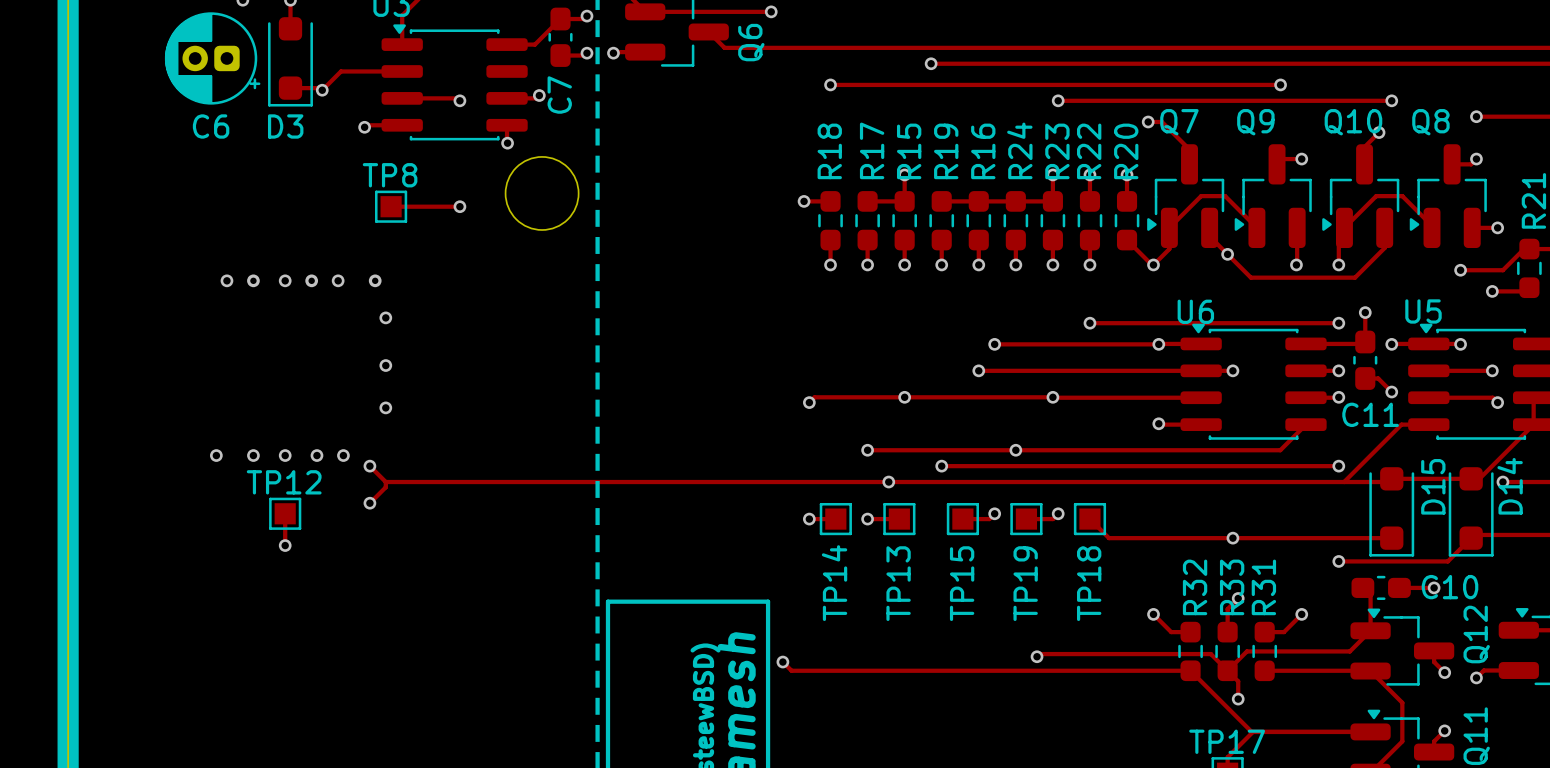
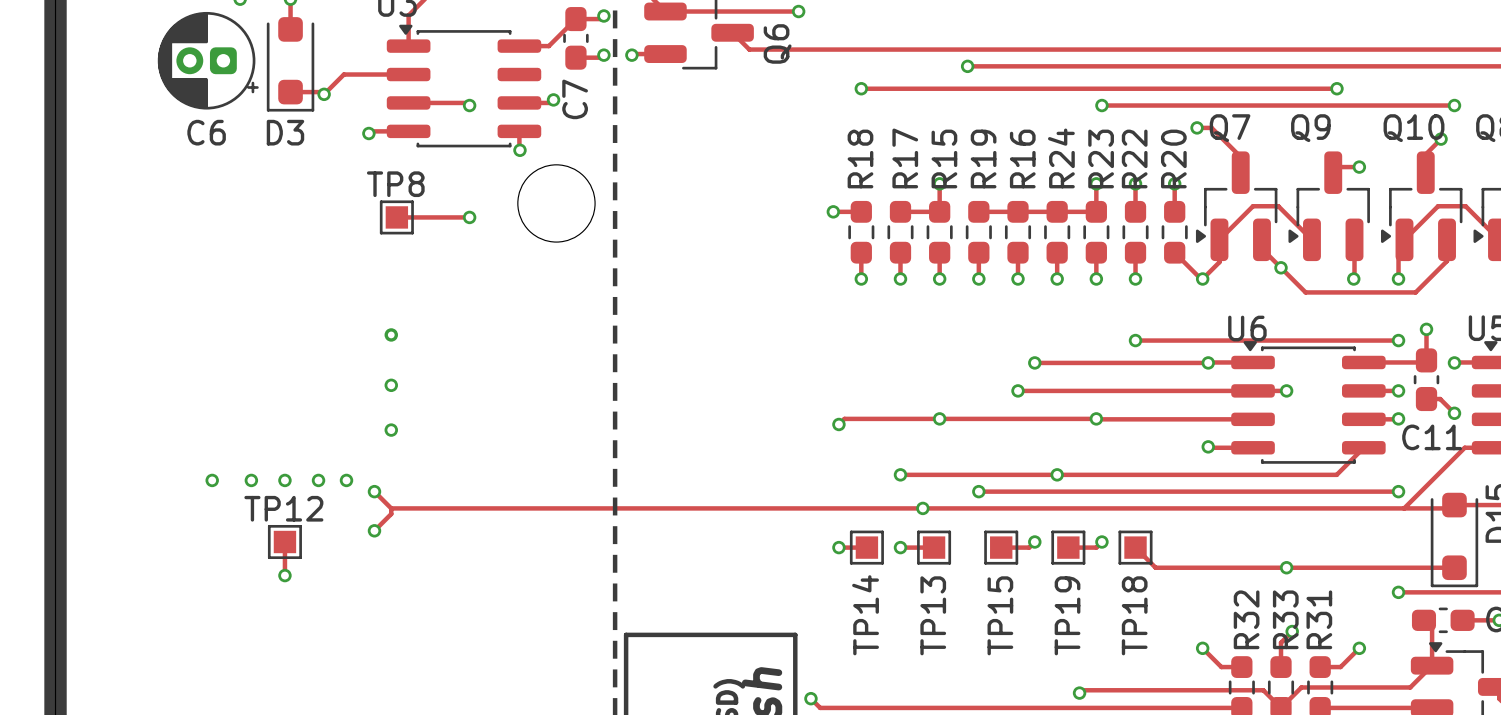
via: (226, 280) -> none
via: (253, 280) -> none
via: (285, 280) -> none
via: (311, 280) -> none
via: (338, 280) -> none
via position: (375, 280) -> (391, 334)
via: (385, 317) -> none

